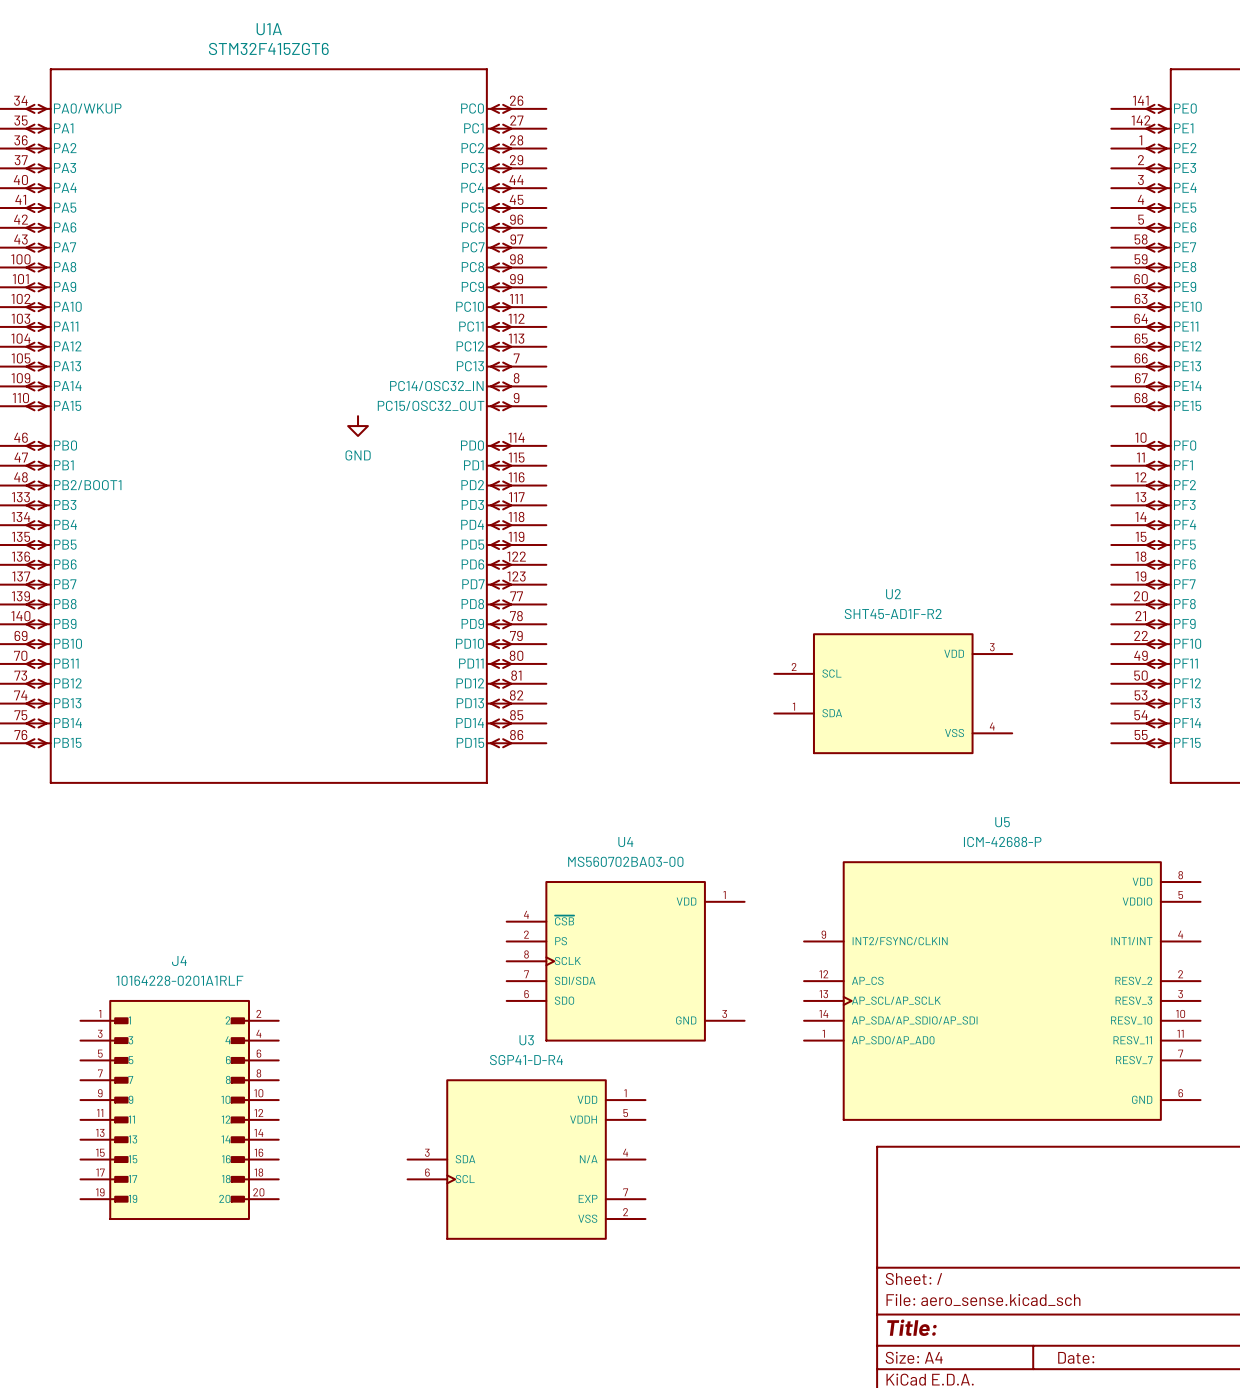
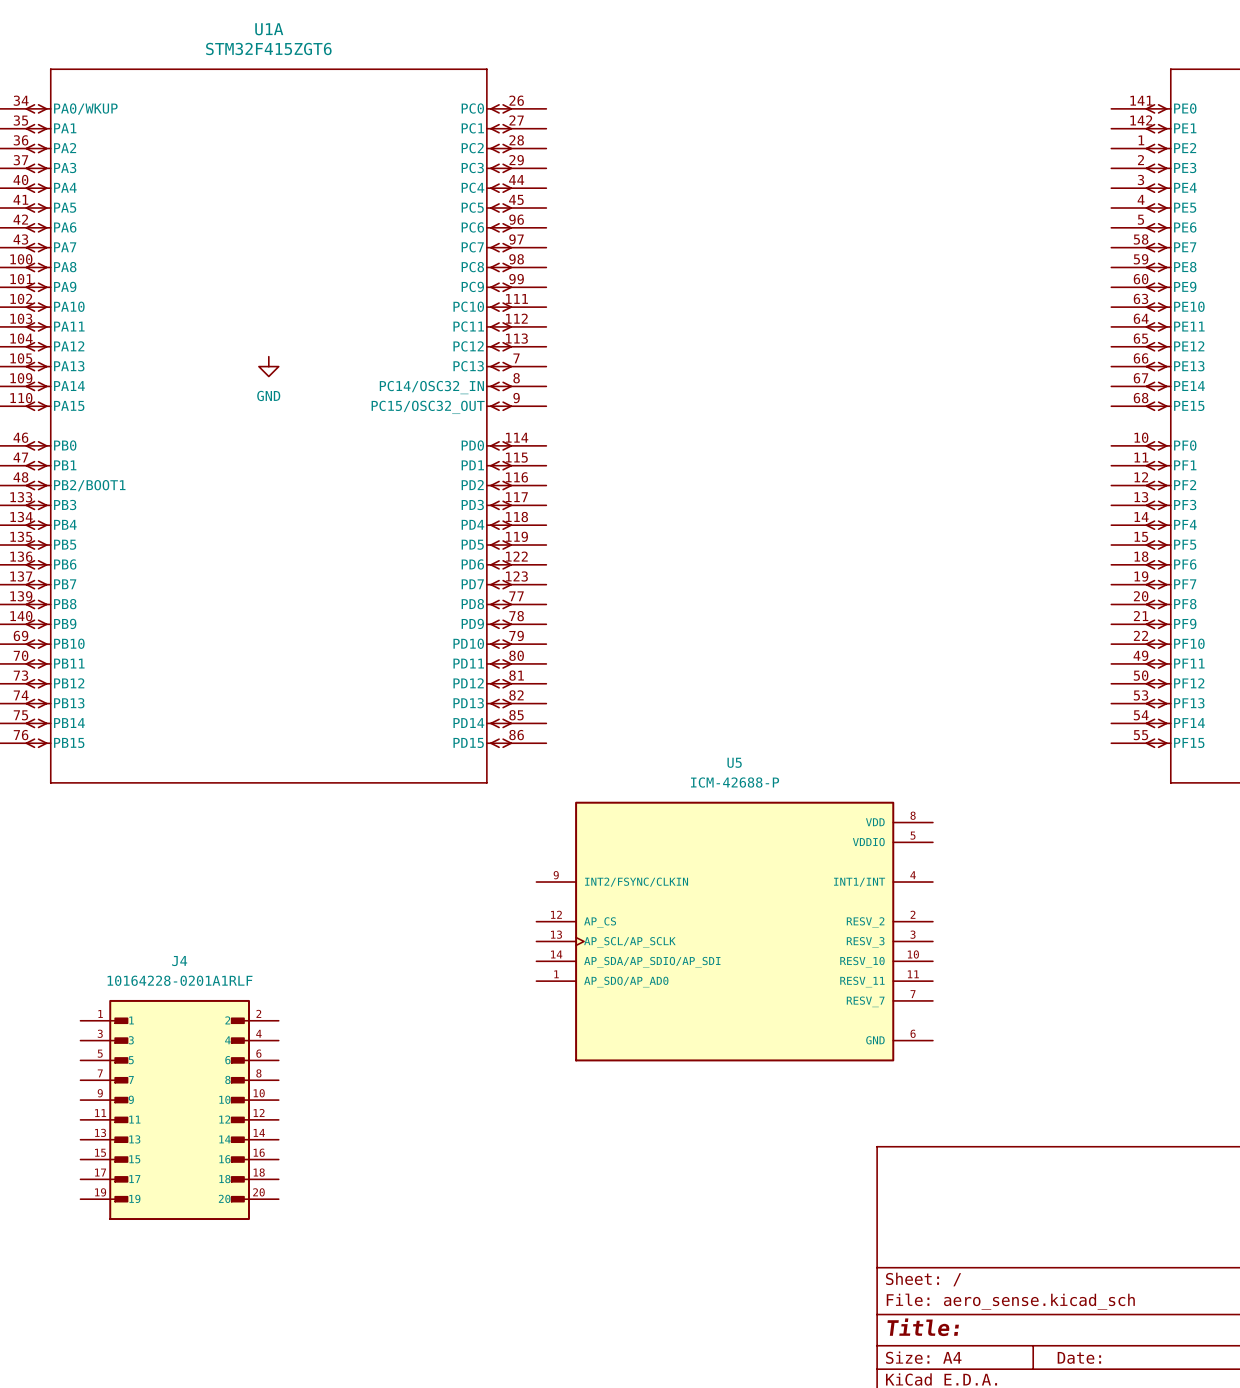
power symbol position: GND (358, 426) -> GND (268, 366)
U2: SHT45-AD1F-R2 (893, 693) -> none
U4: MS560702BA03-00 (625, 961) -> none
U5 position: (1002, 991) -> (734, 931)
U3: SGP41-D-R4 (526, 1159) -> none

